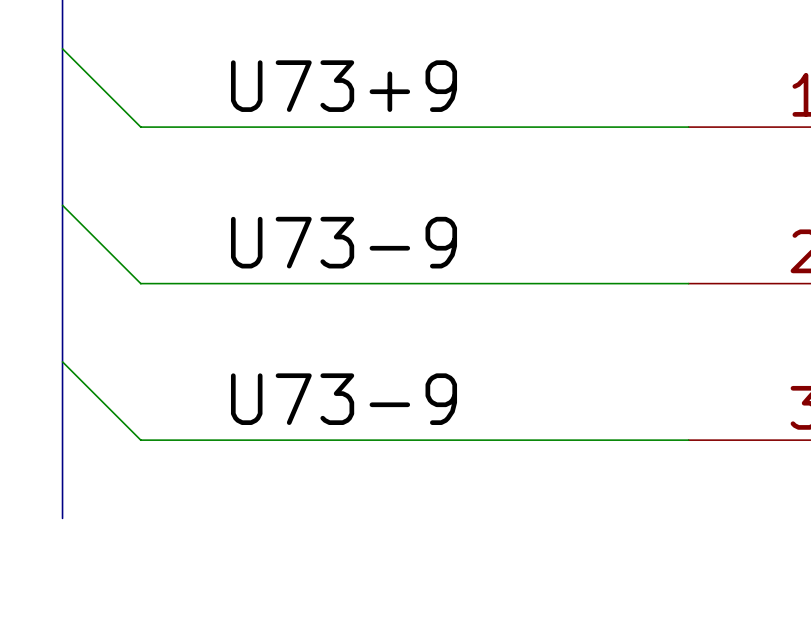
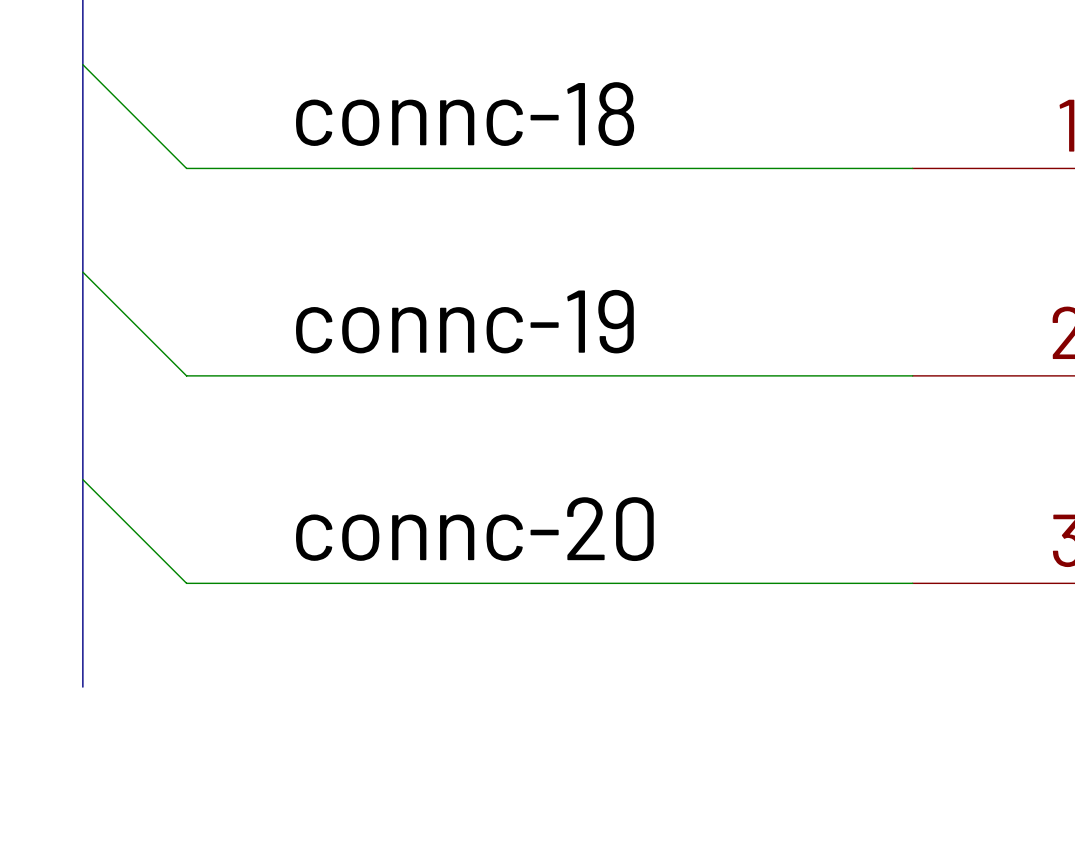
label: U73+9 (344, 86) -> connc-18 (465, 114)
label: U73-9 (344, 242) -> connc-19 (464, 321)
label: U73-9 (344, 399) -> connc-20 (474, 529)

